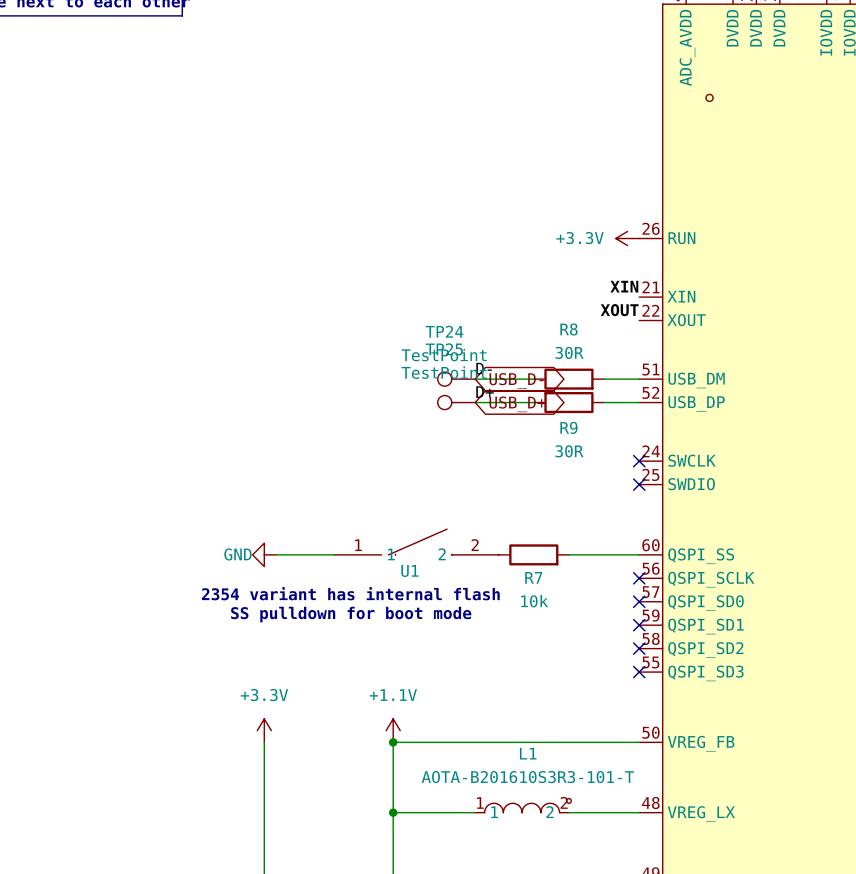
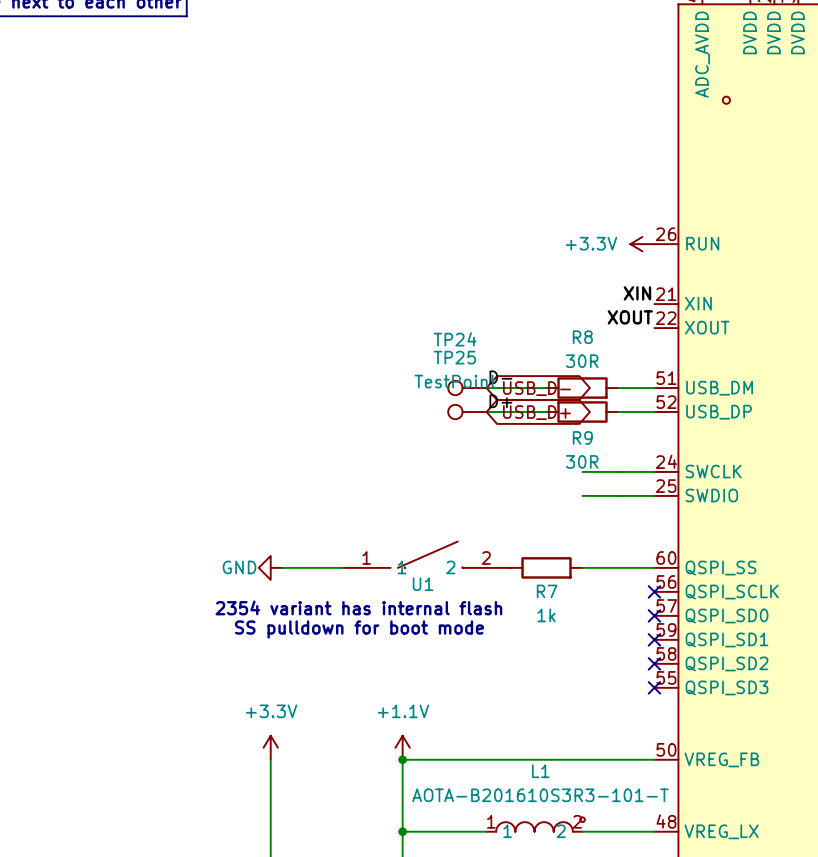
TP24 value: TestPoint (444, 355) -> none
wire: none -> (582, 471) (654, 471)
no-connect mark: (639, 461) -> none
wire: none -> (582, 495) (654, 495)
no-connect mark: (639, 484) -> none
R7 value: 10k (534, 601) -> 1k (546, 615)

